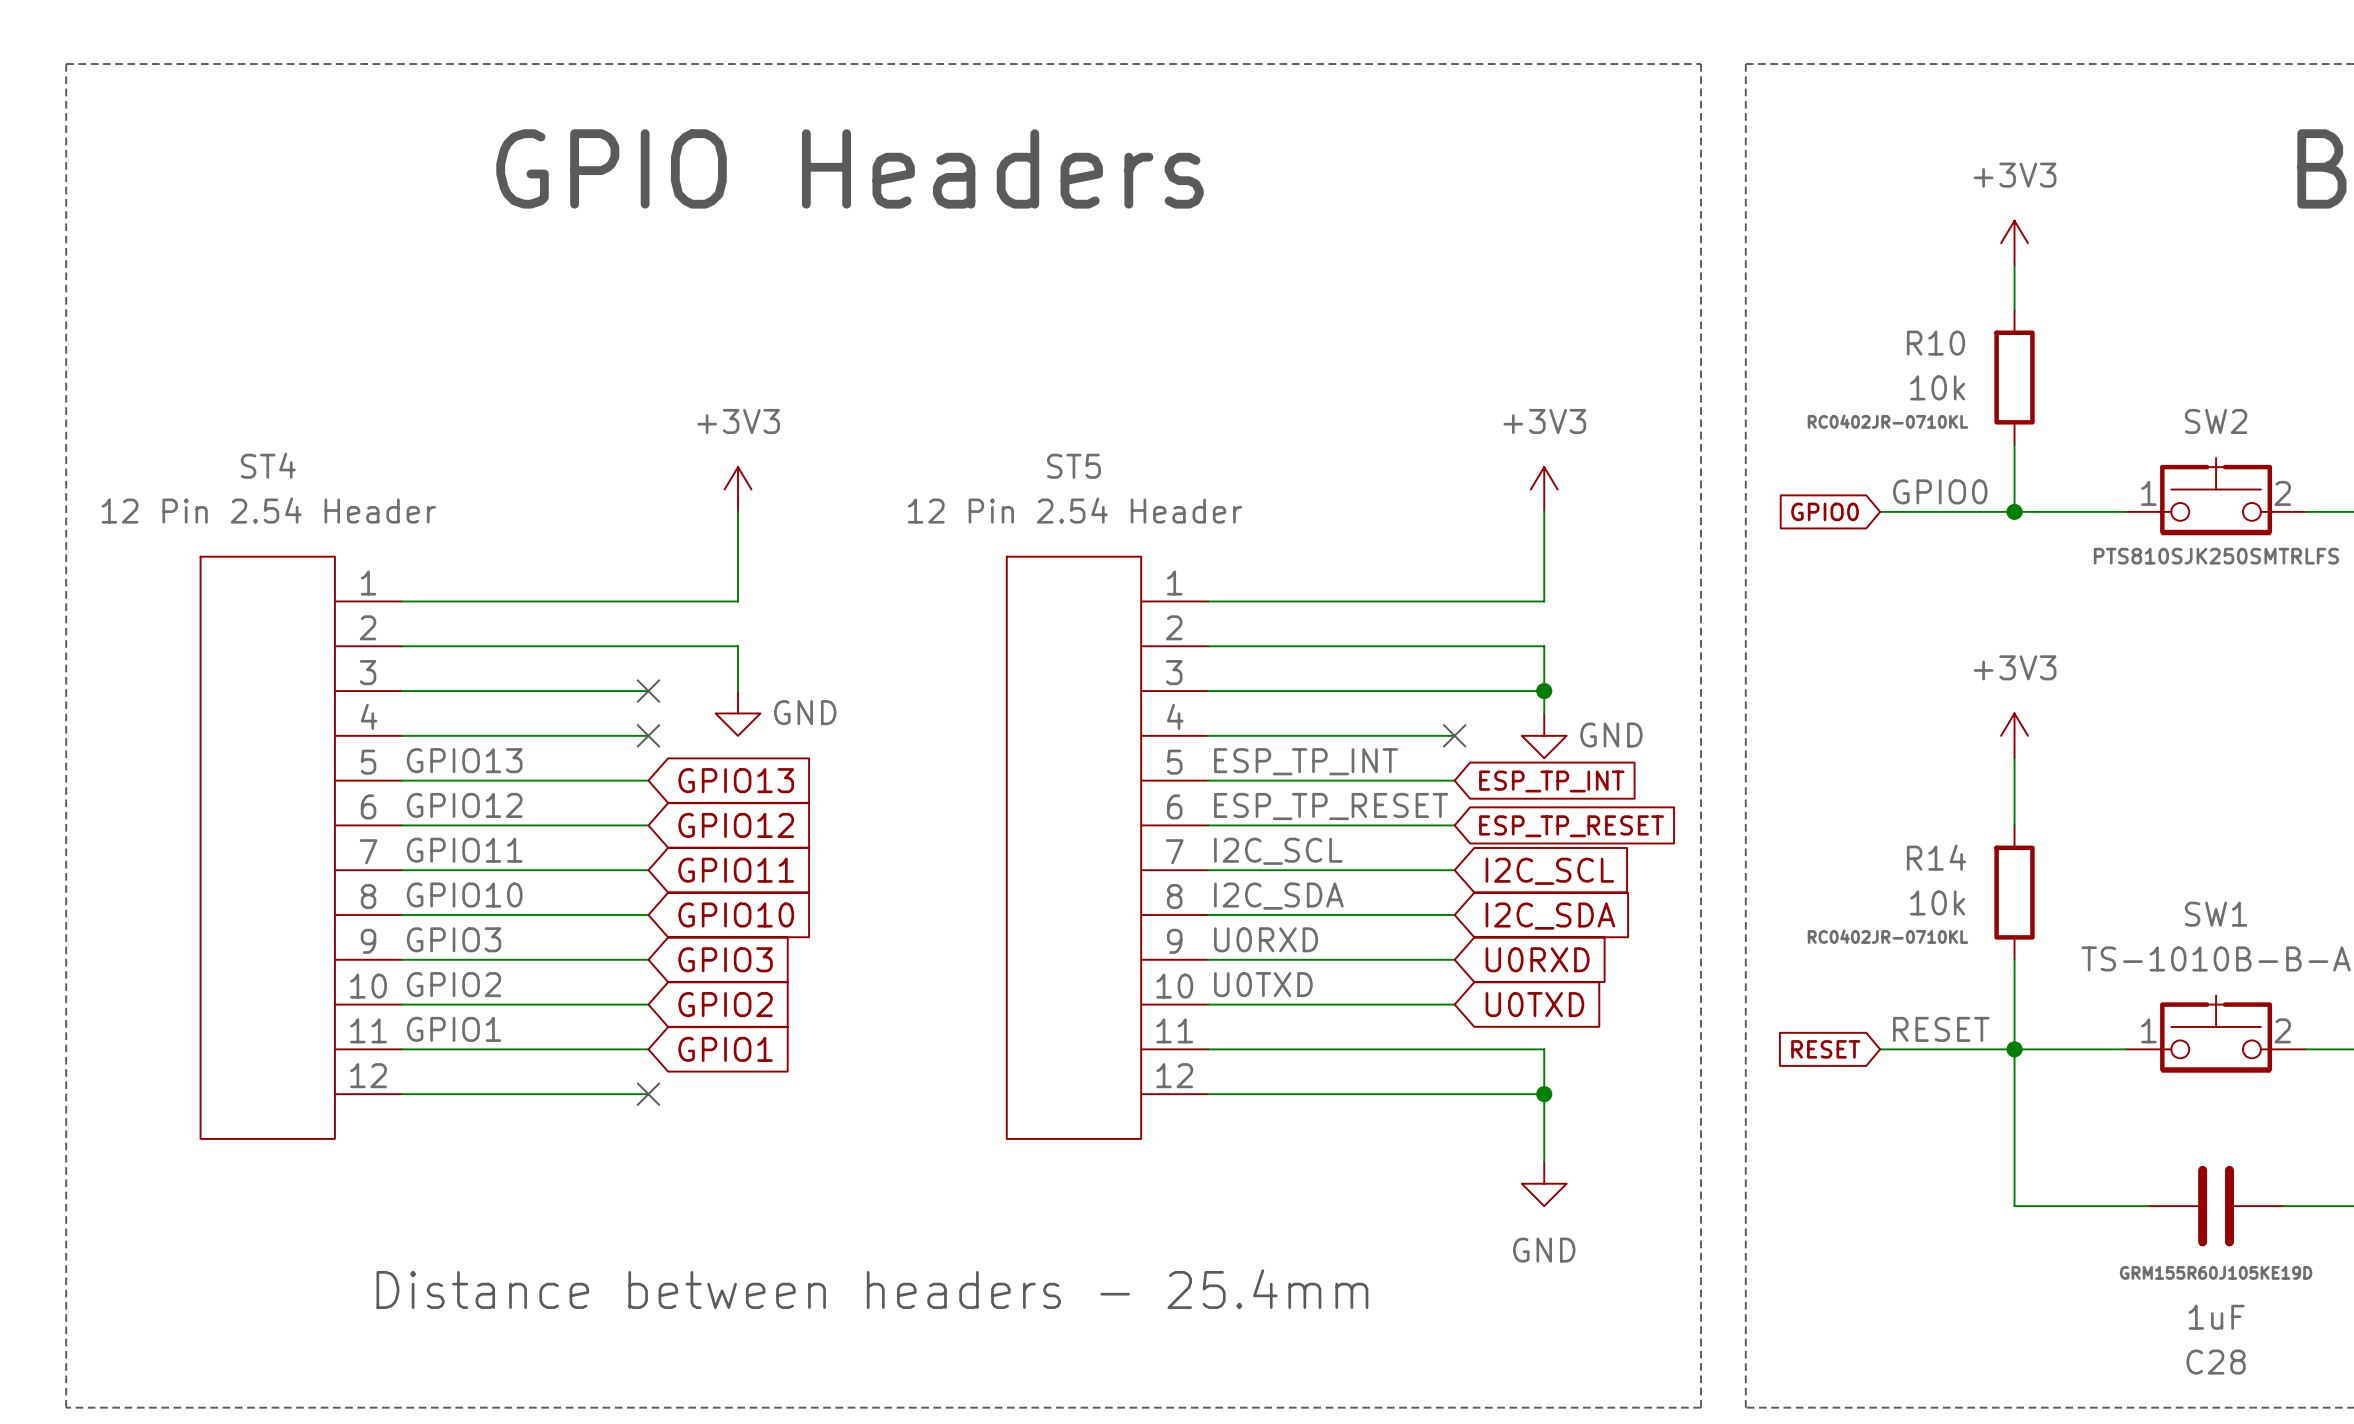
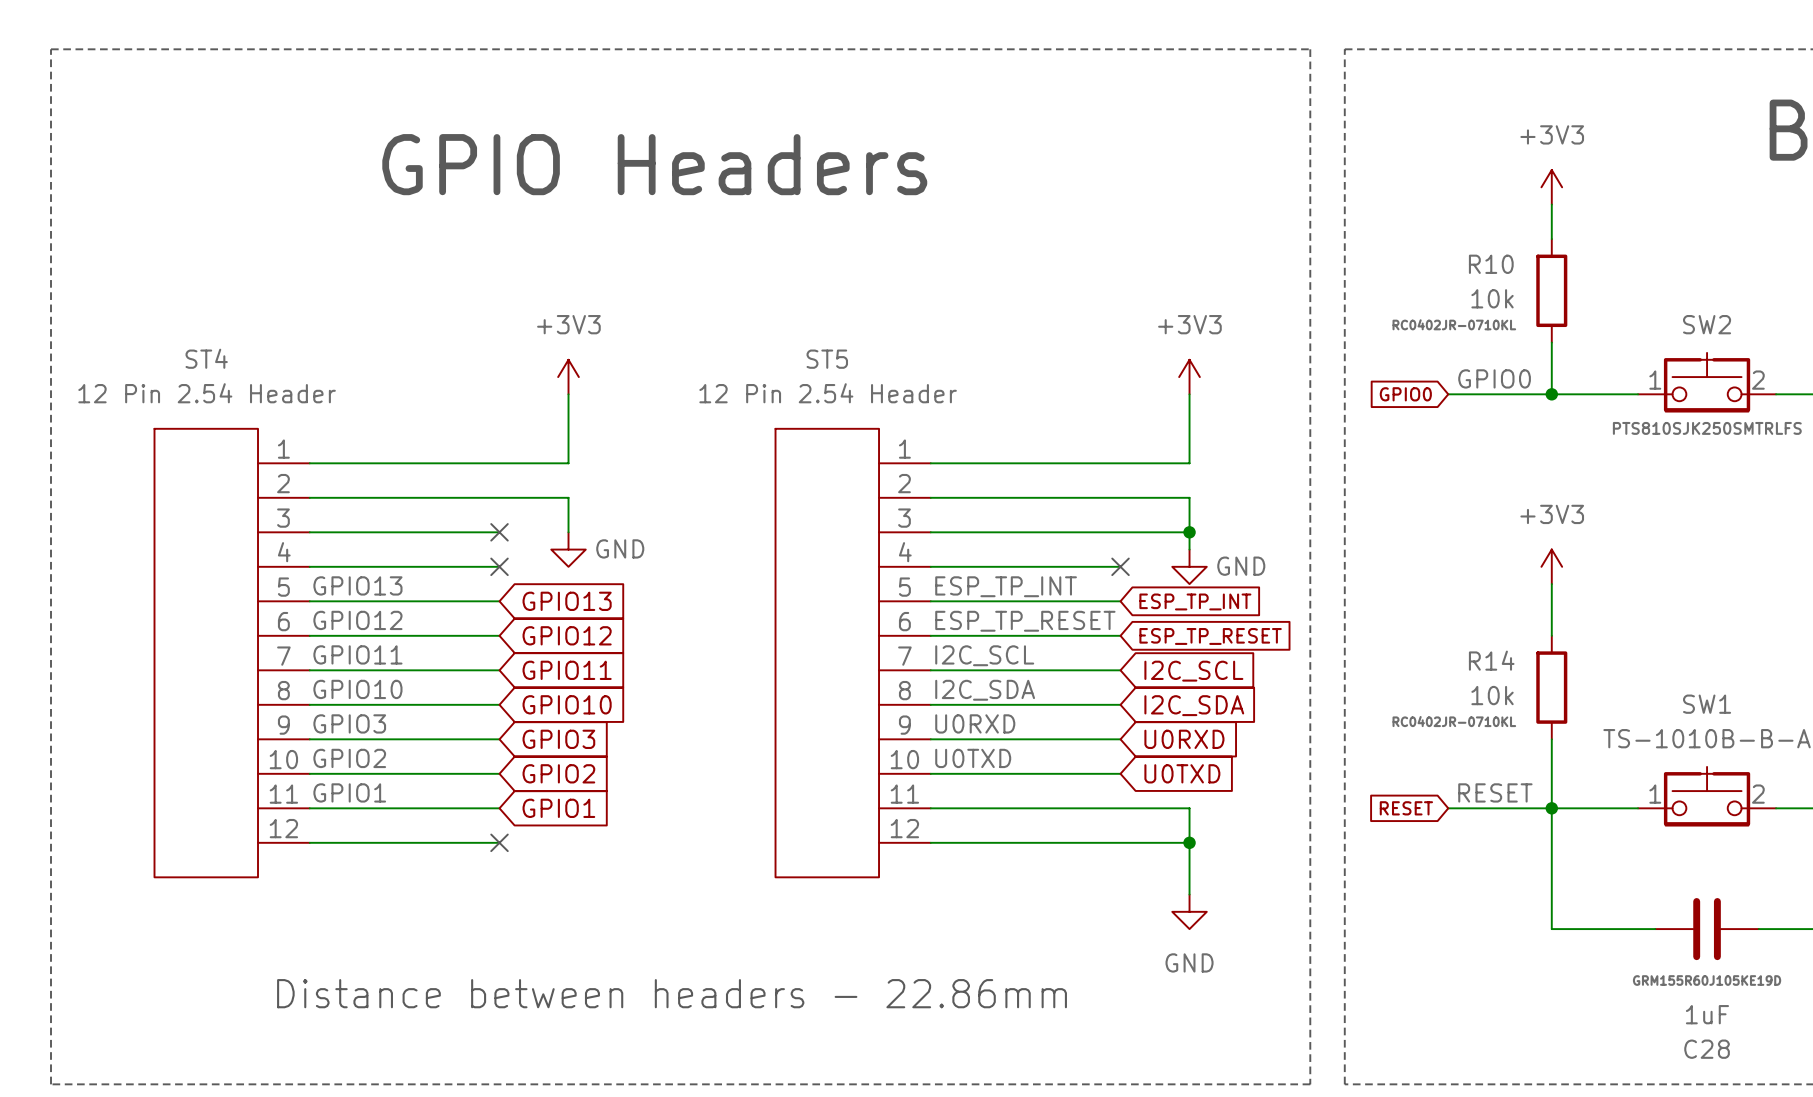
text position: GPIO Headers (850, 168) -> GPIO Headers (654, 164)
text: Distance between headers - 25.4mm (872, 1289) -> Distance between headers - 22.86mm (672, 993)

